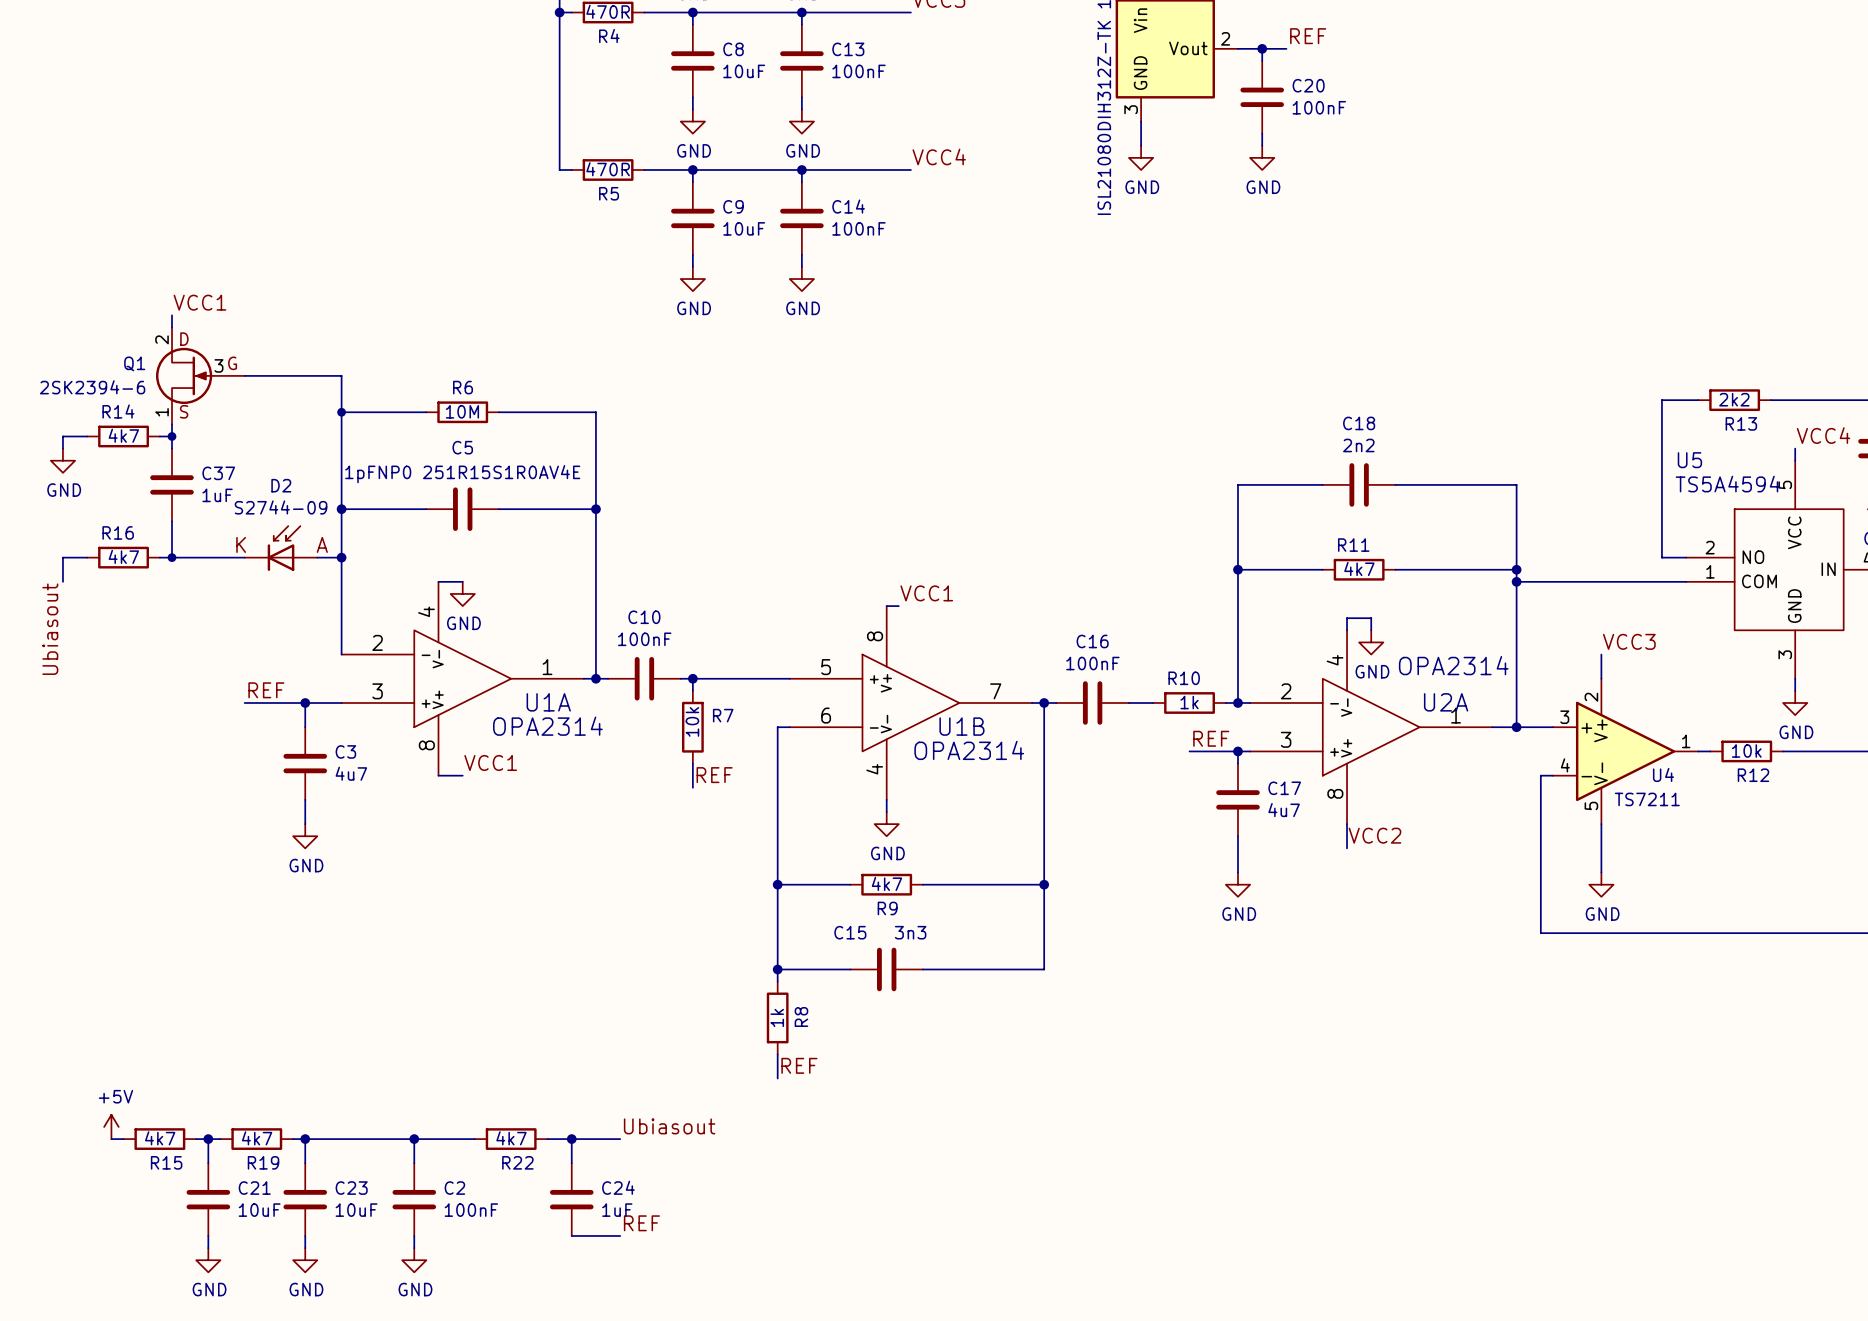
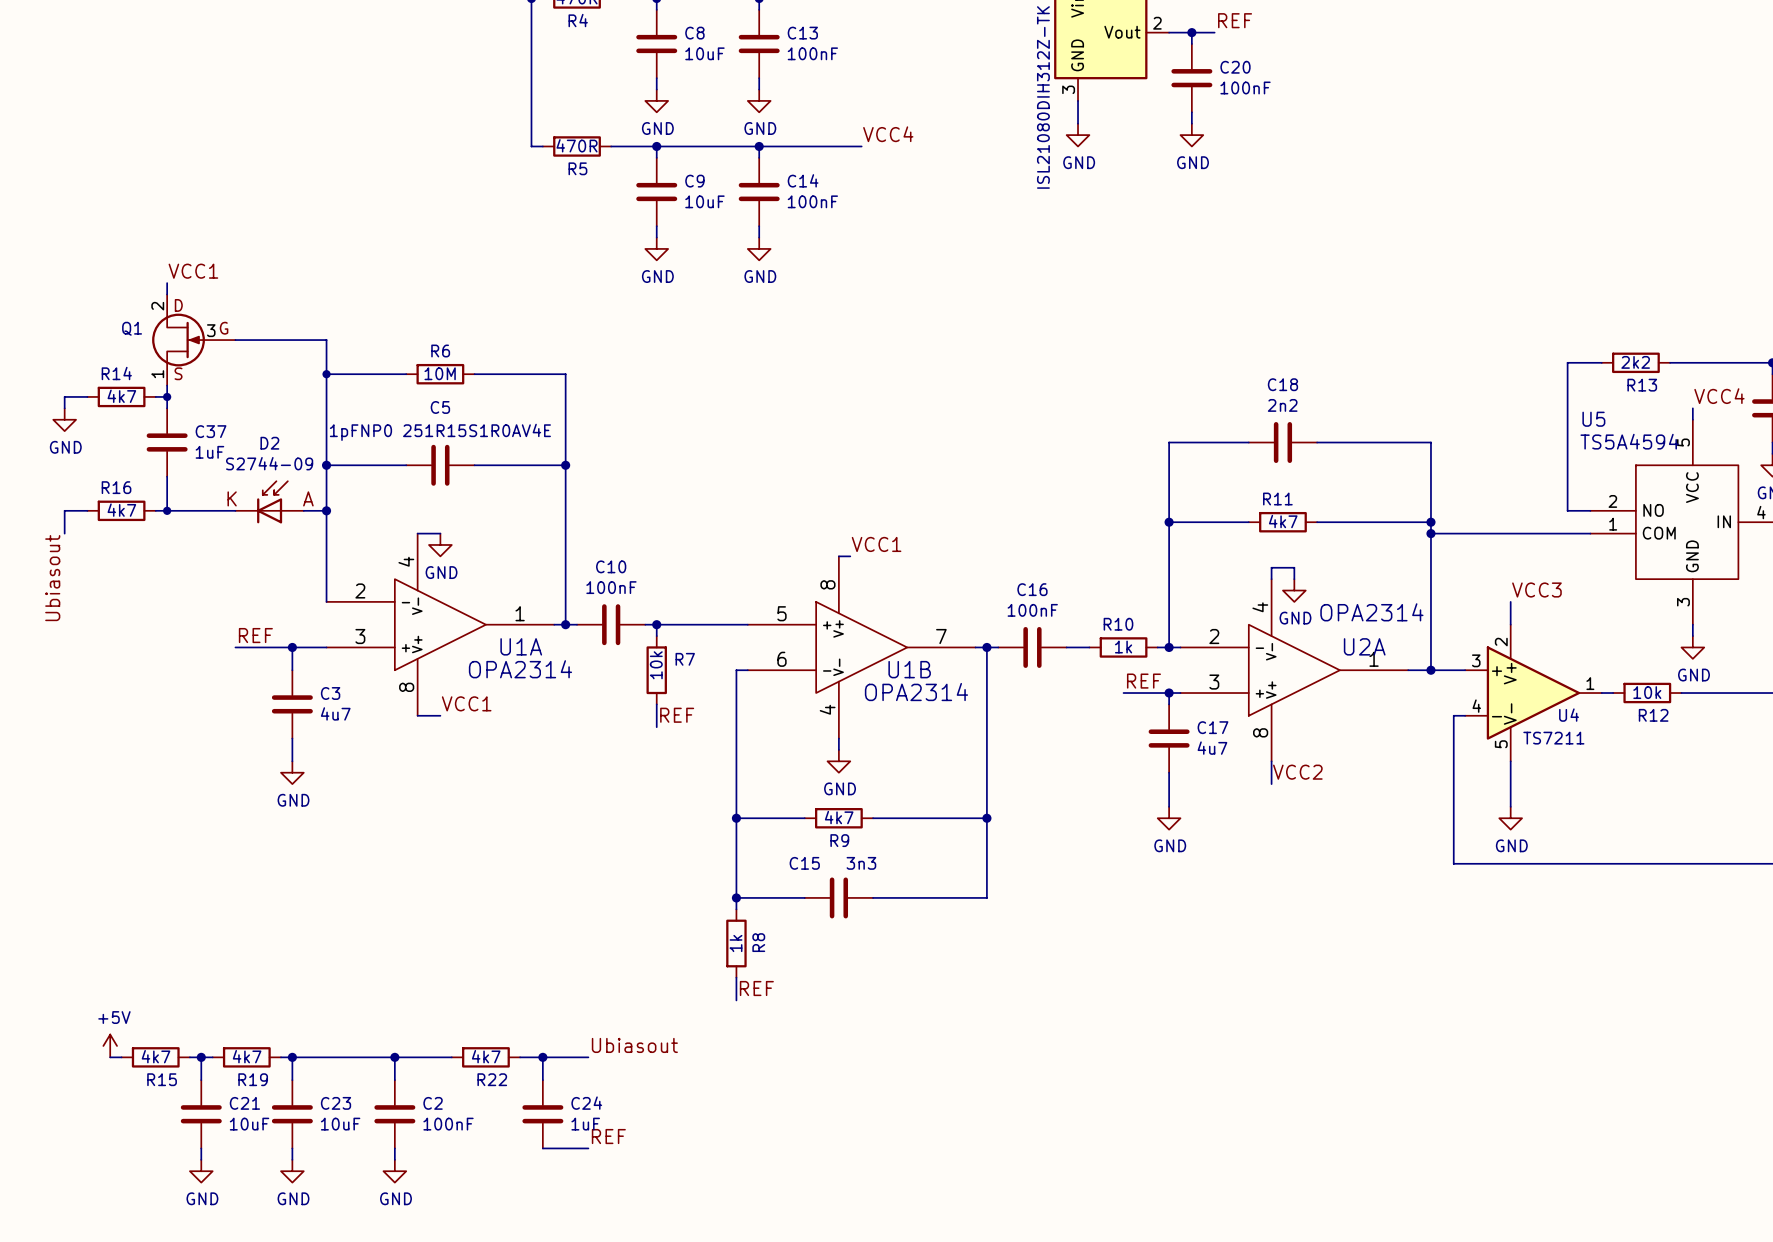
Q1 value: 2SK2394-6 (92, 387) -> none

